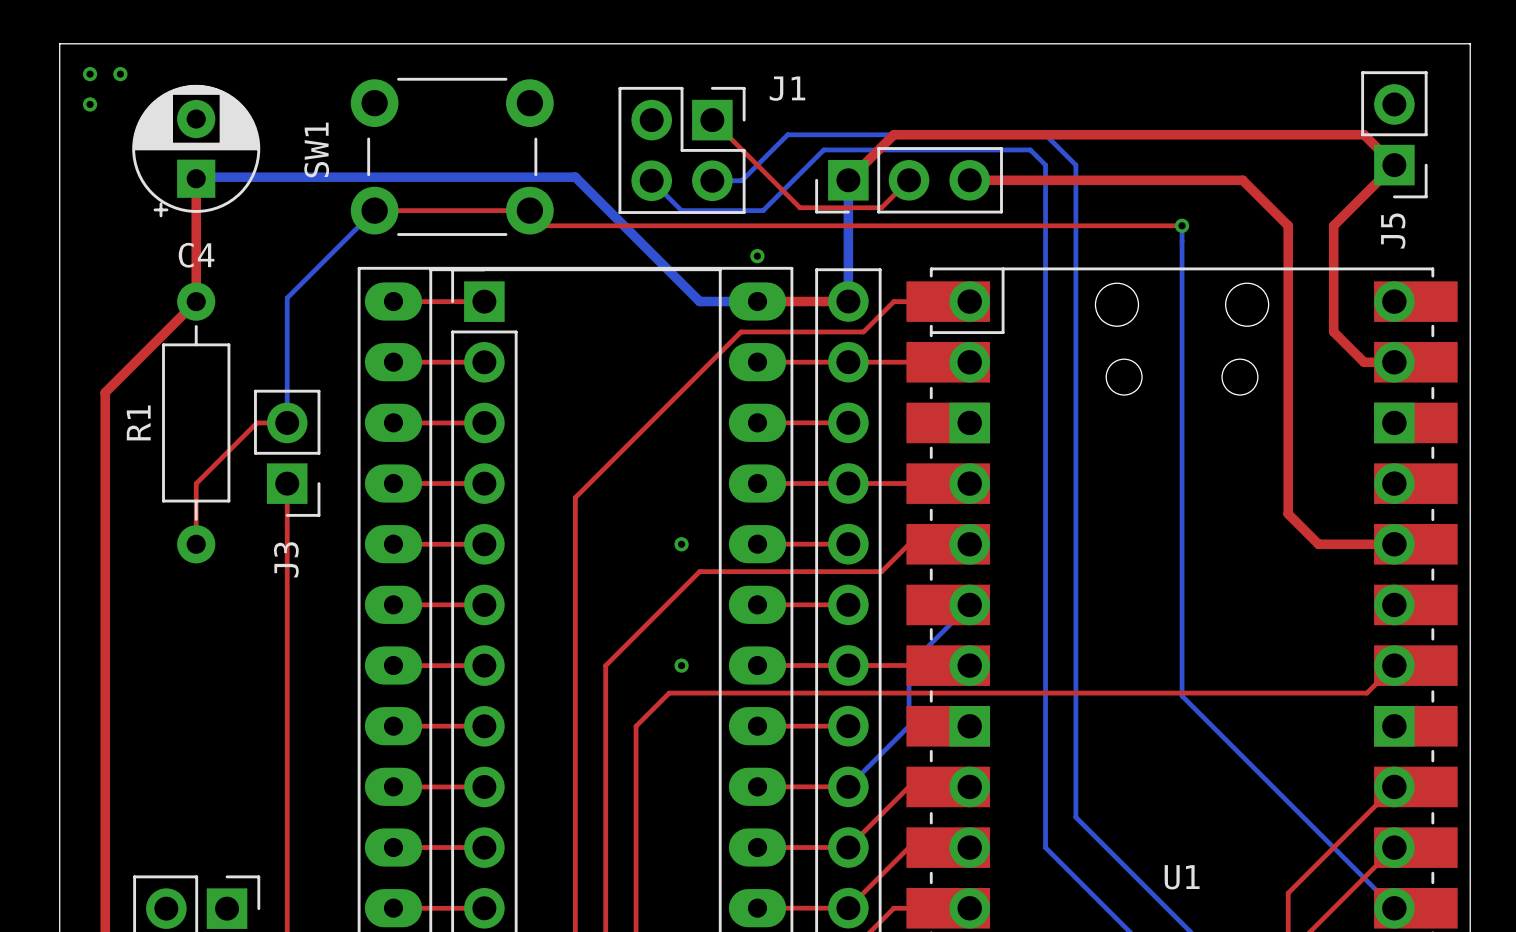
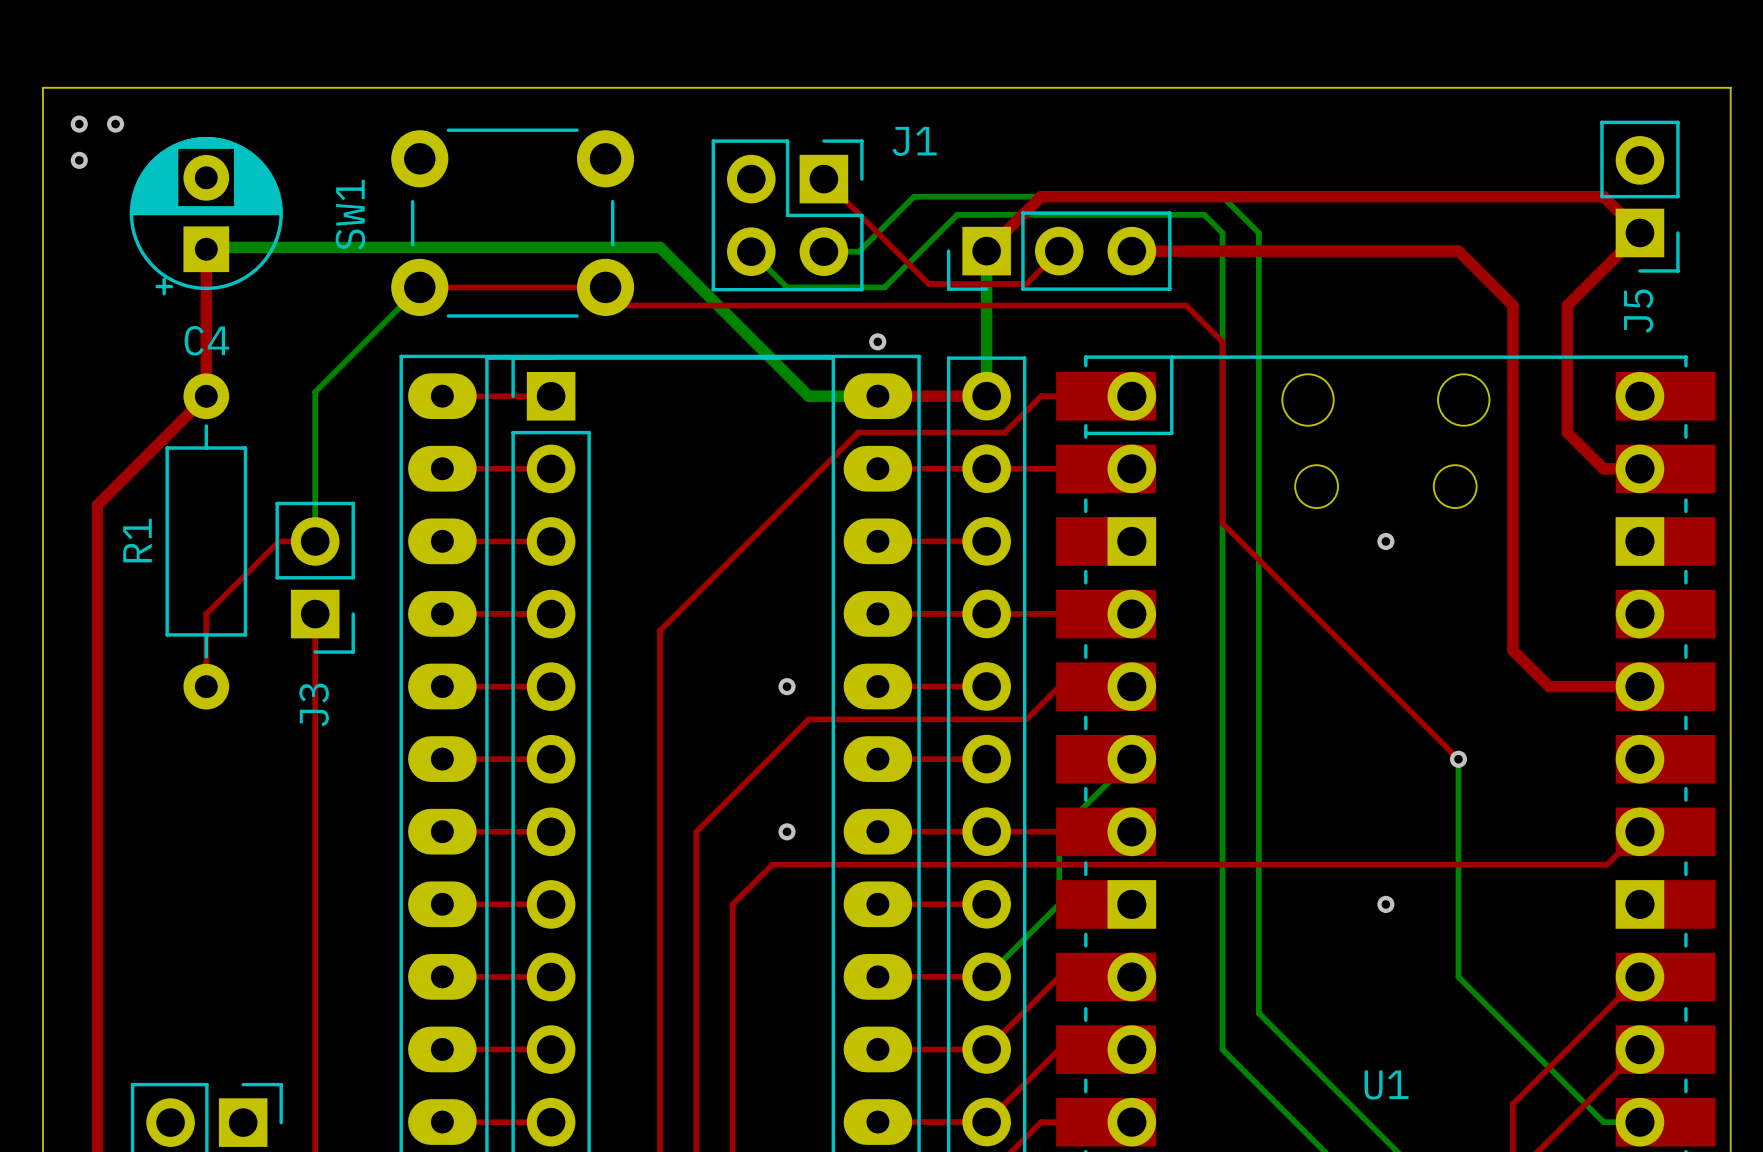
top track: (1015, 225) (1182, 225) -> (1186, 305) (1222, 341) (1222, 523) (1458, 759)
bottom track: (1182, 225) (1182, 695) (1394, 908) -> (1458, 759) (1458, 977) (1603, 1122) (1639, 1122)
via: (1182, 225) -> none
via: none -> (1385, 541)
via: none -> (1458, 759)
via: none -> (1385, 904)

